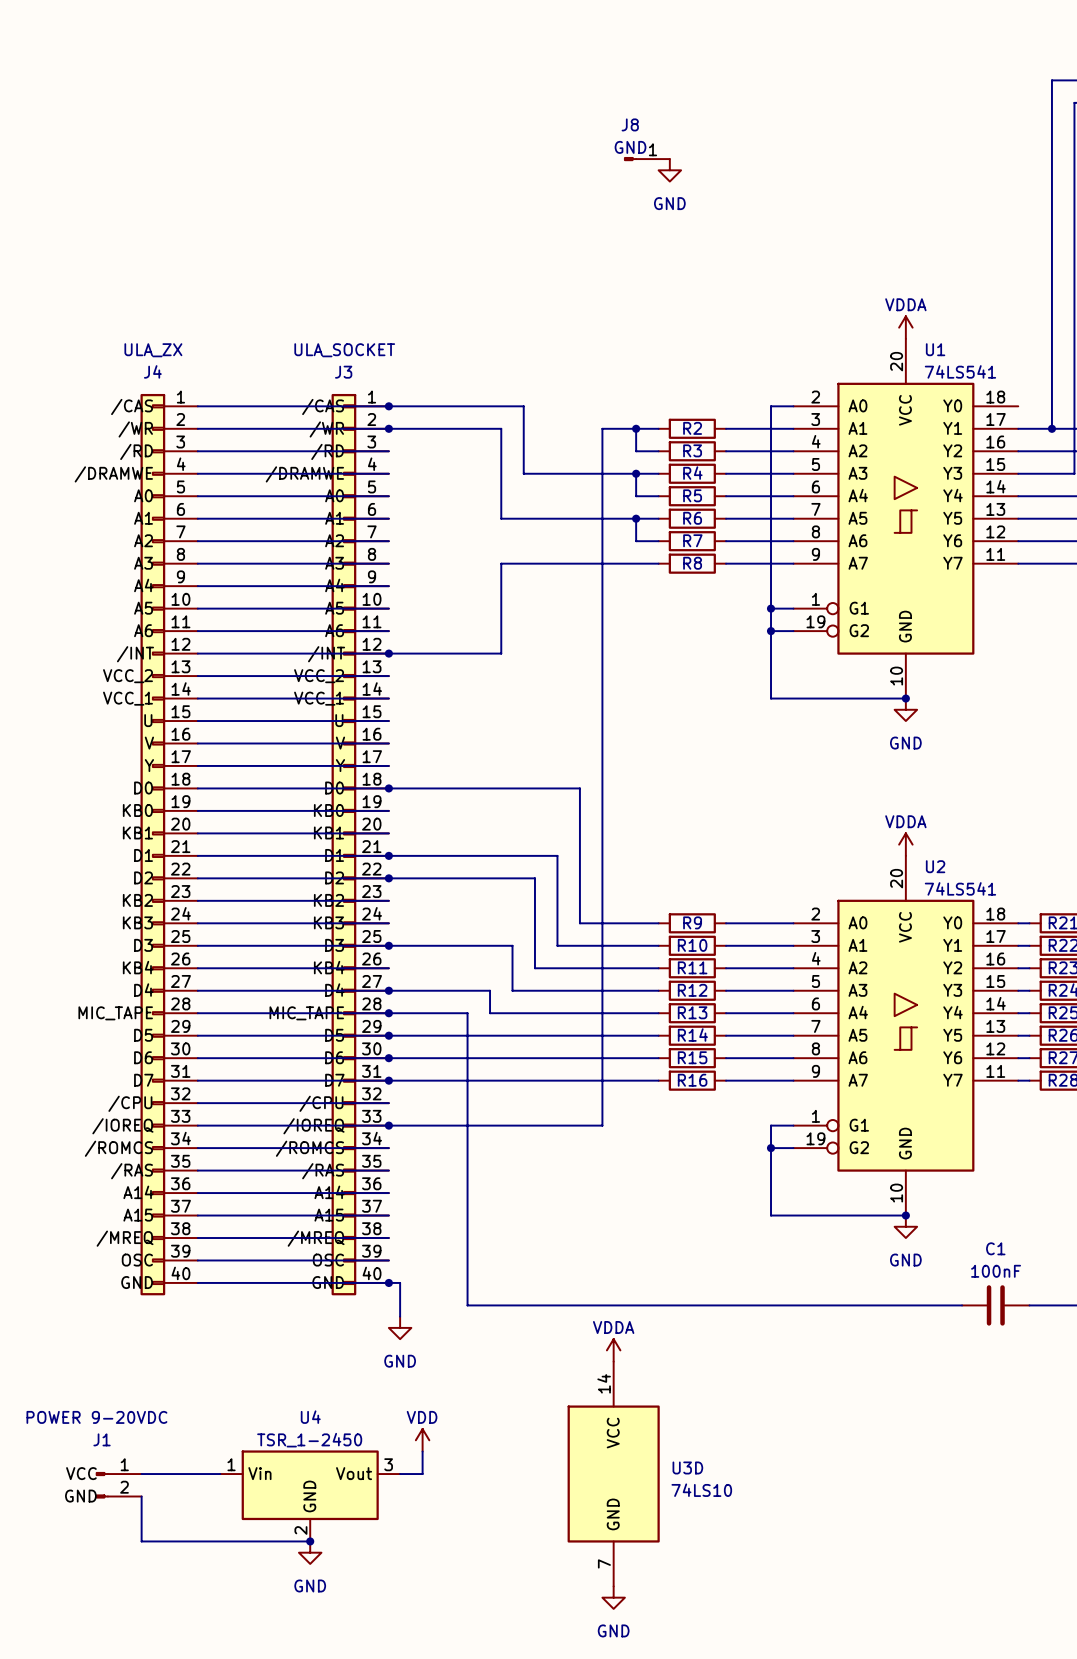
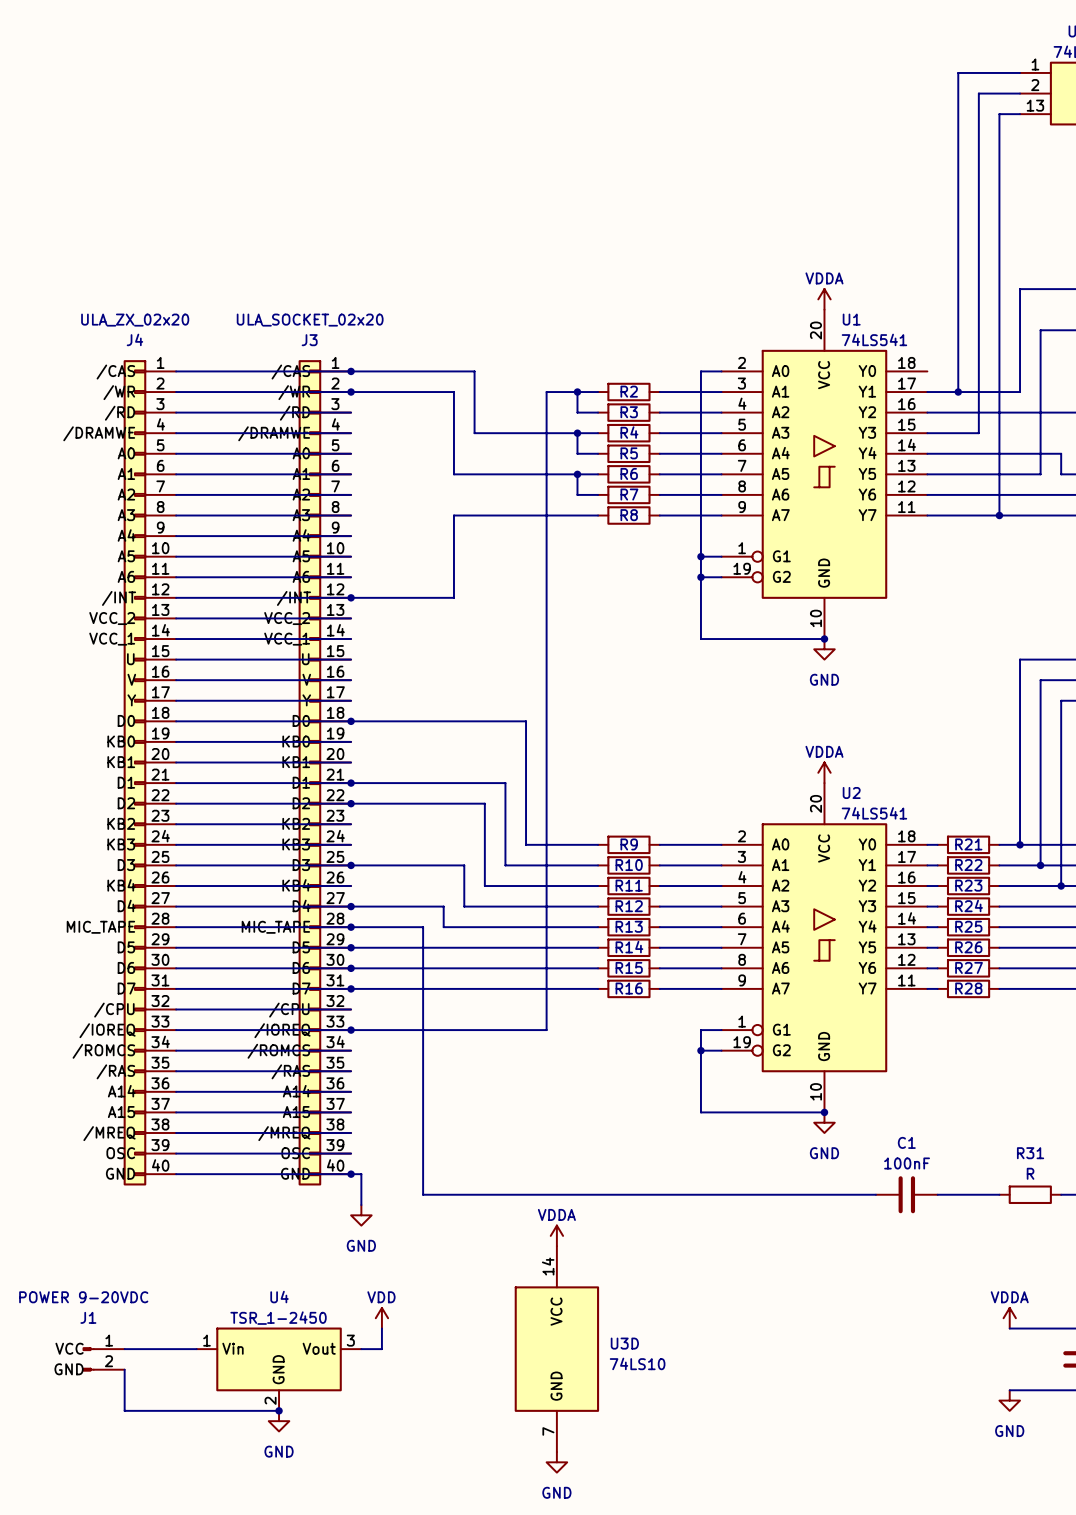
J8: GND (647, 159) -> none
power symbol: GND (669, 170) -> none
J4 value: ULA_ZX (153, 350) -> ULA_ZX_02x20 (135, 320)
J3 value: ULA_SOCKET (344, 350) -> ULA_SOCKET_02x20 (310, 320)

